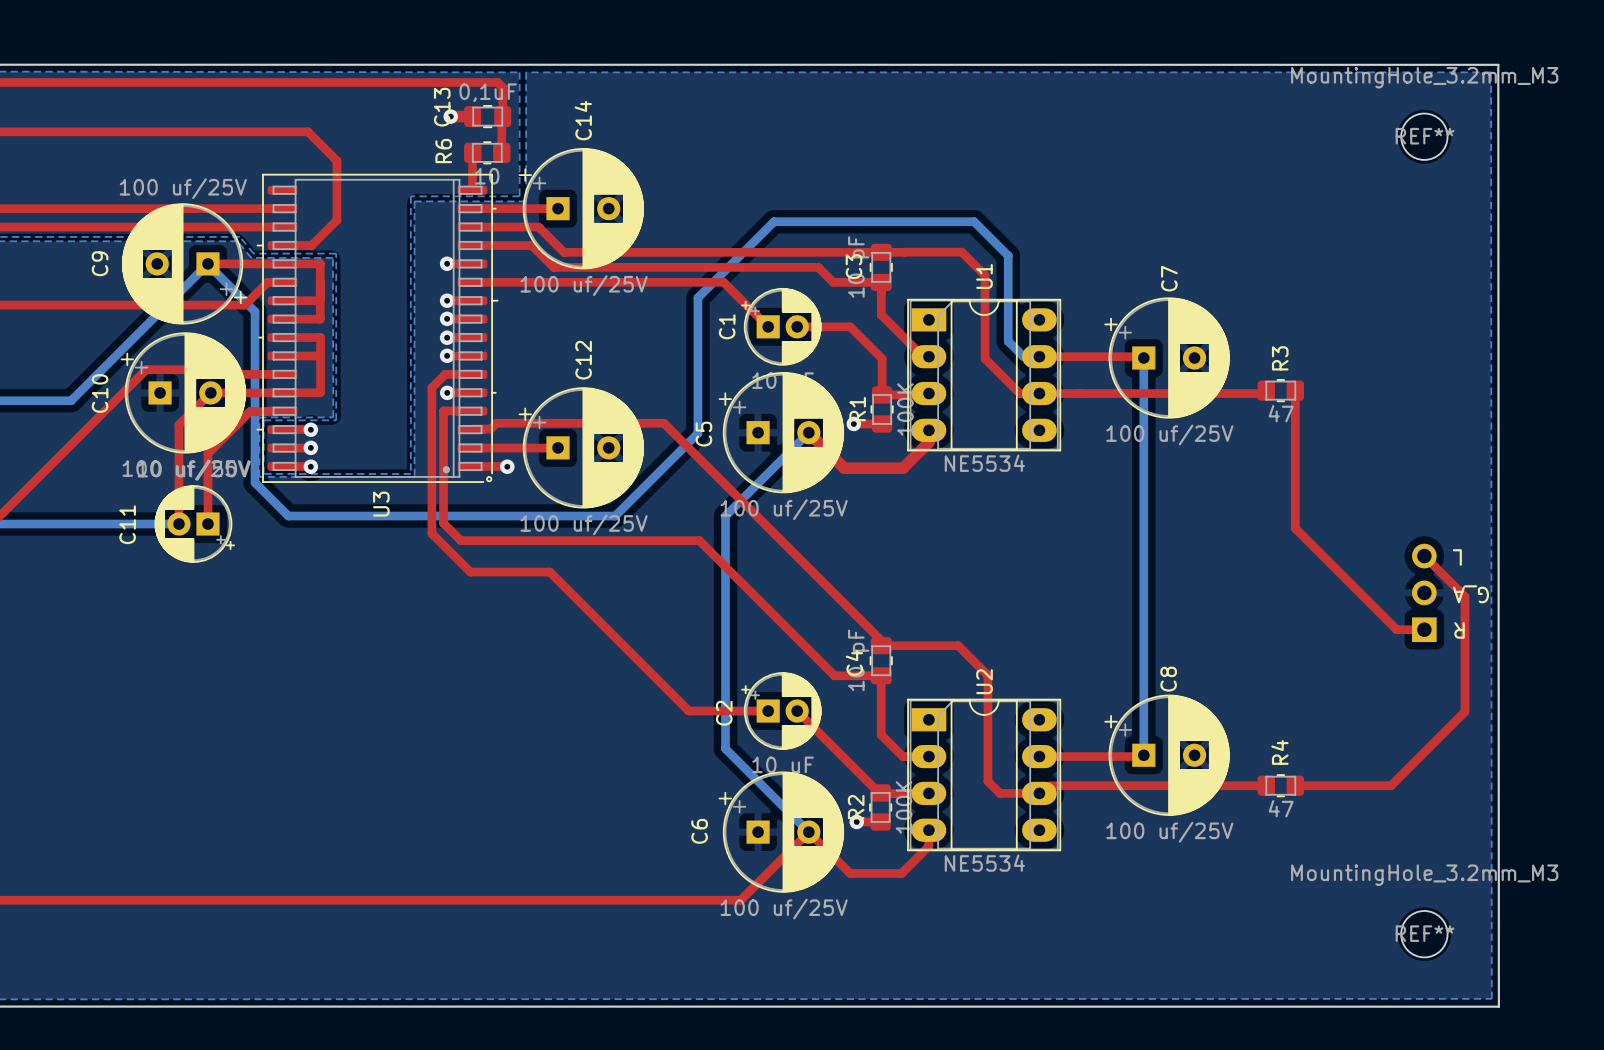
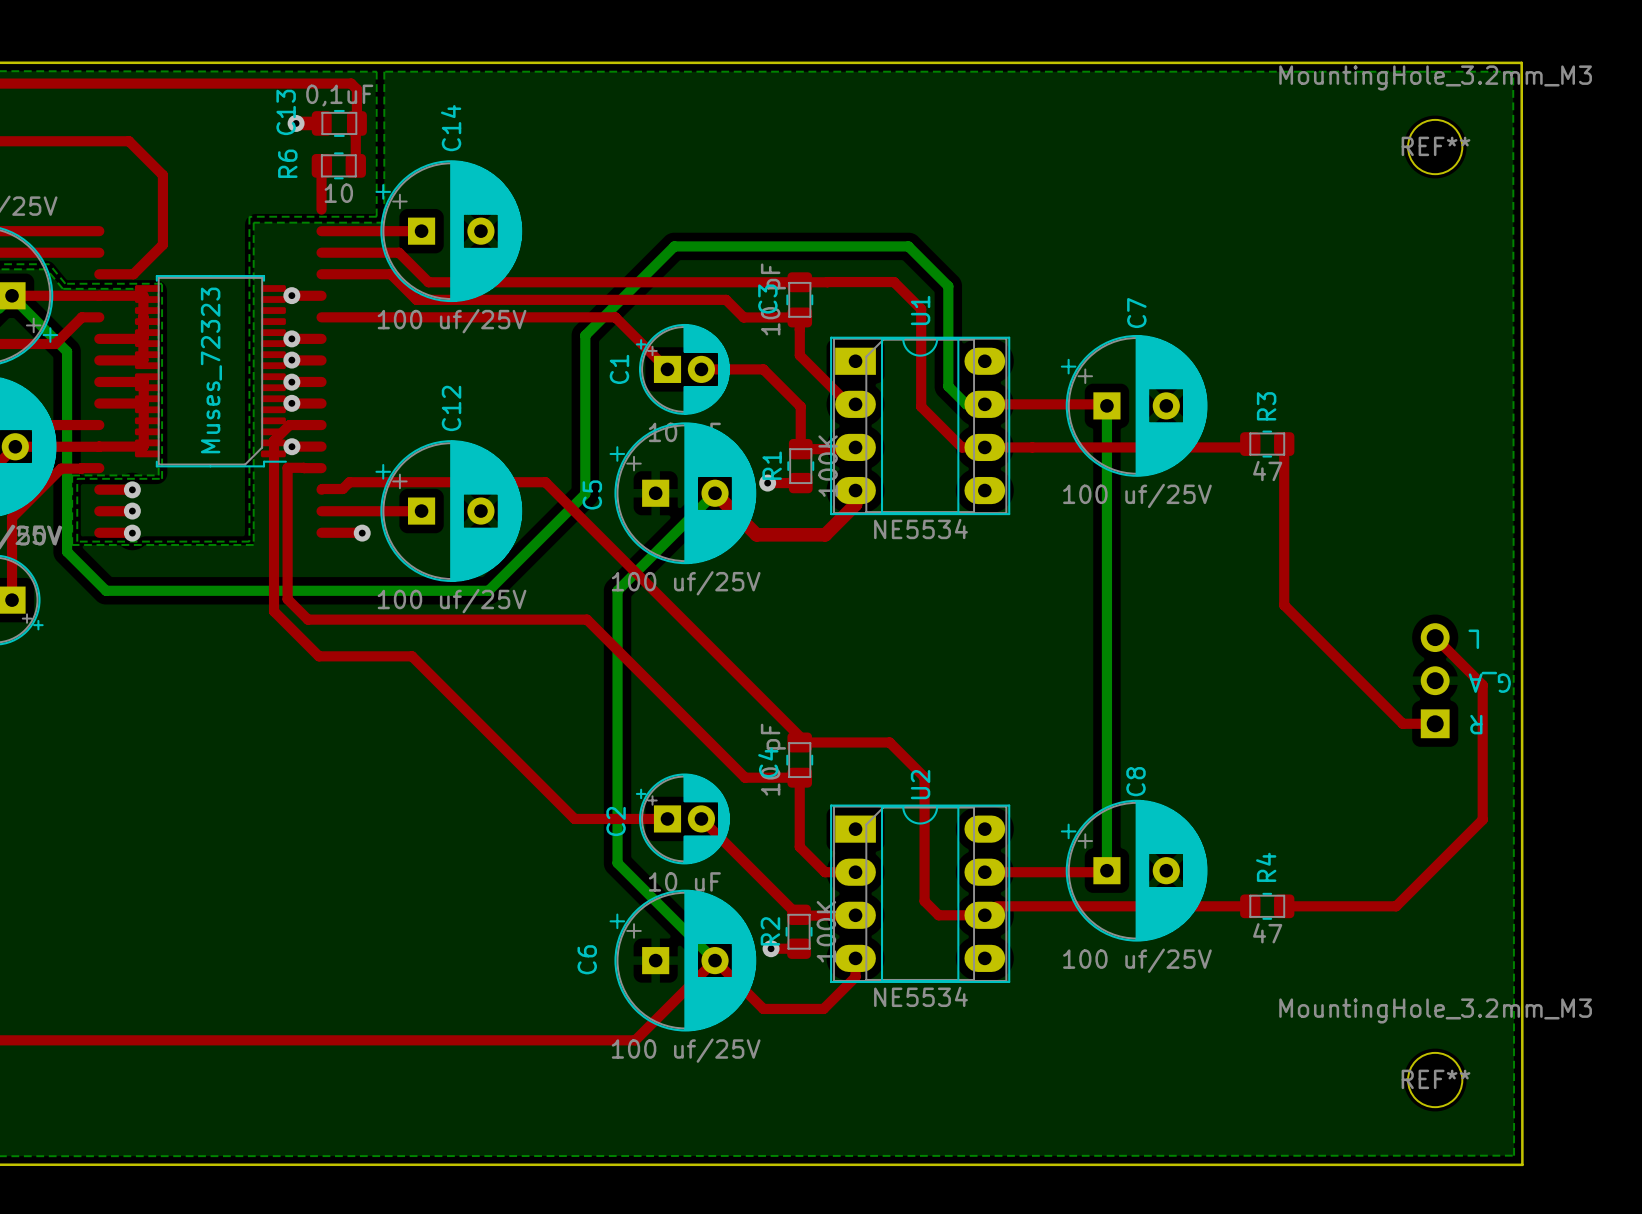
U3: (377, 328) -> none
part: none -> Muses_72323 (210, 371)

